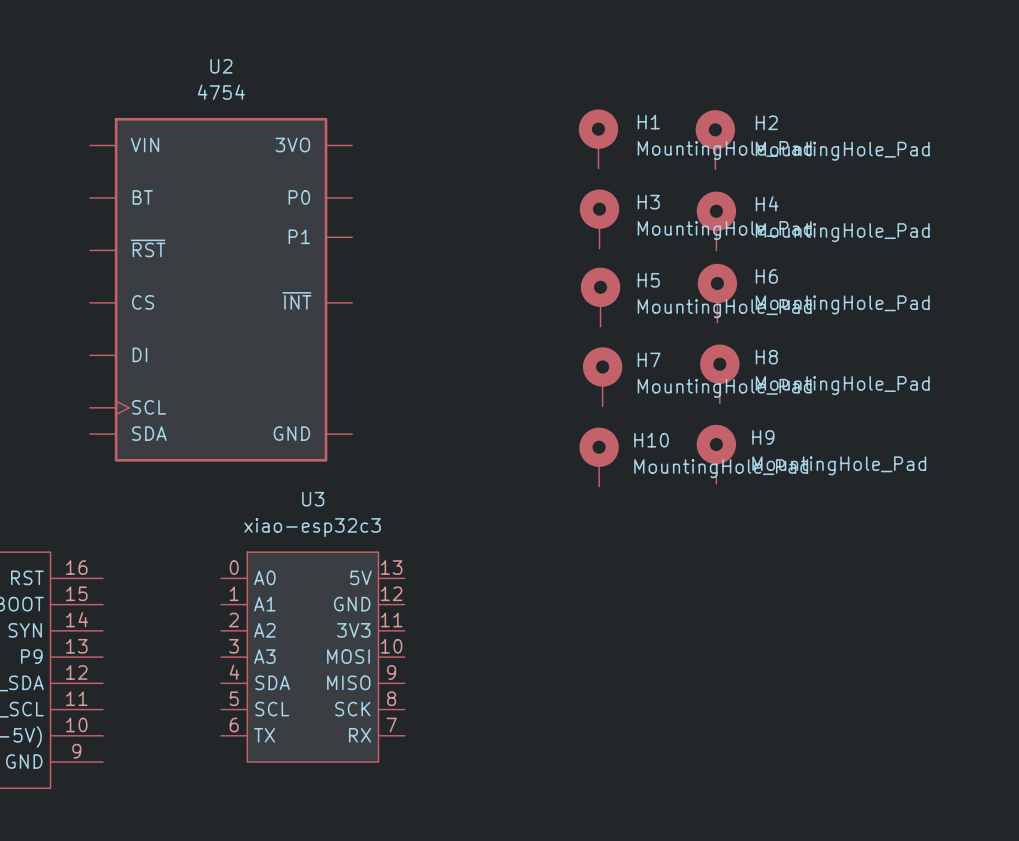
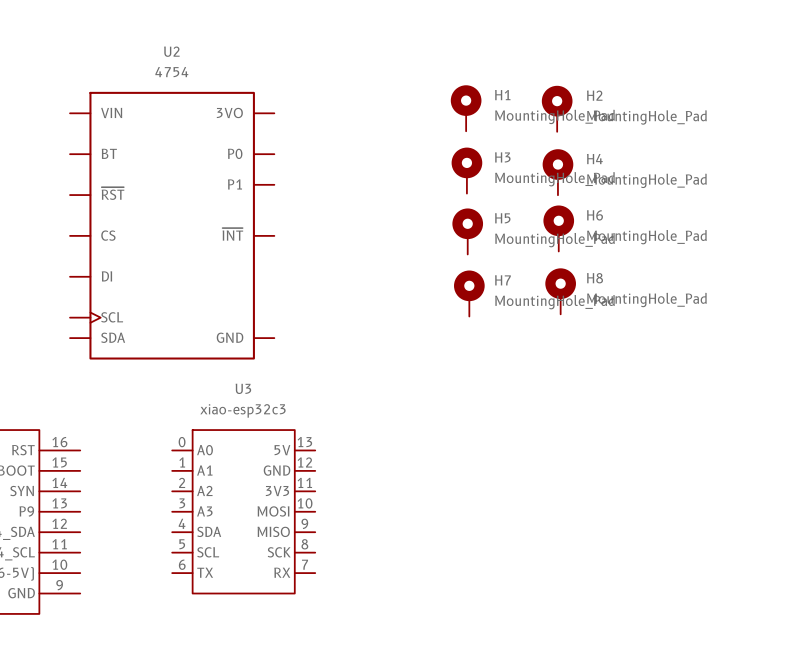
H9: MountingHole_Pad (716, 454) -> none
H10: MountingHole_Pad (599, 457) -> none

